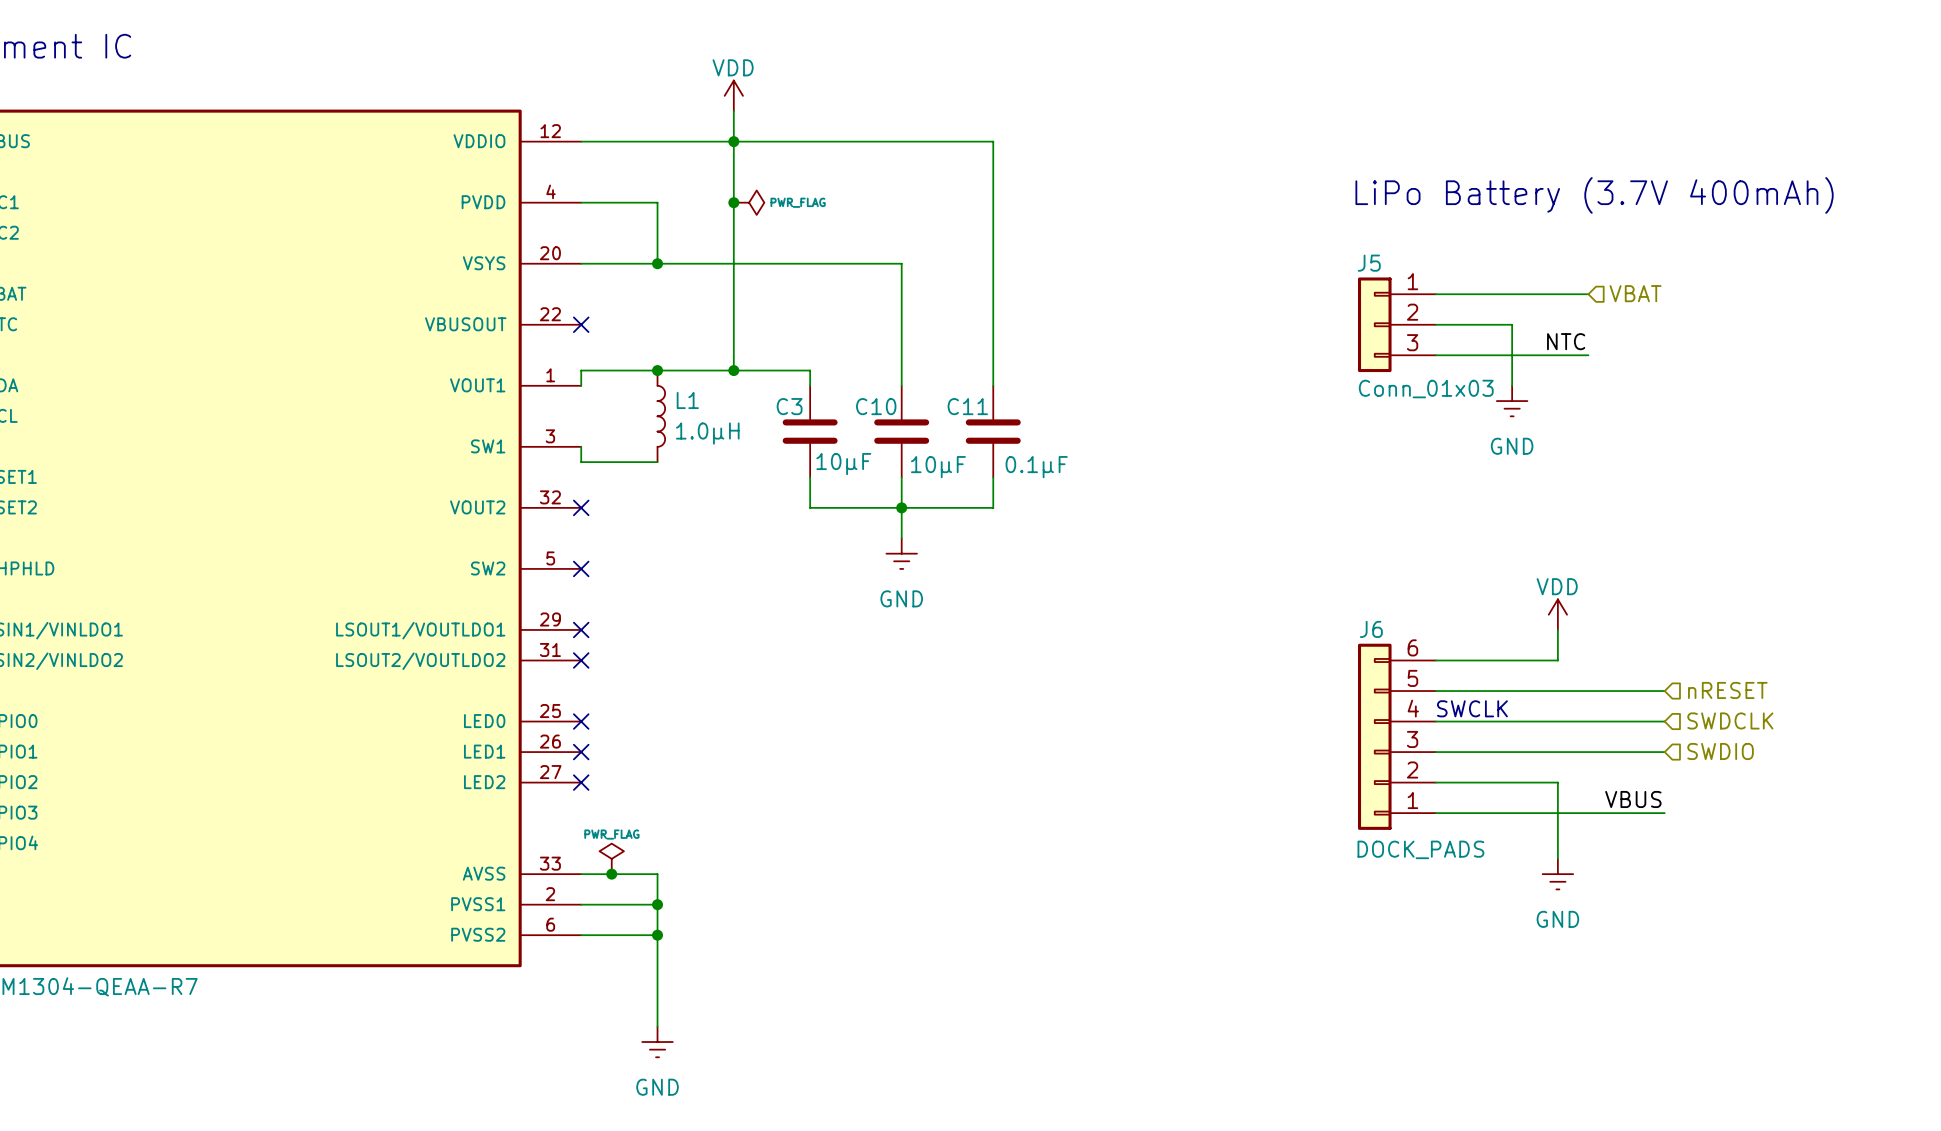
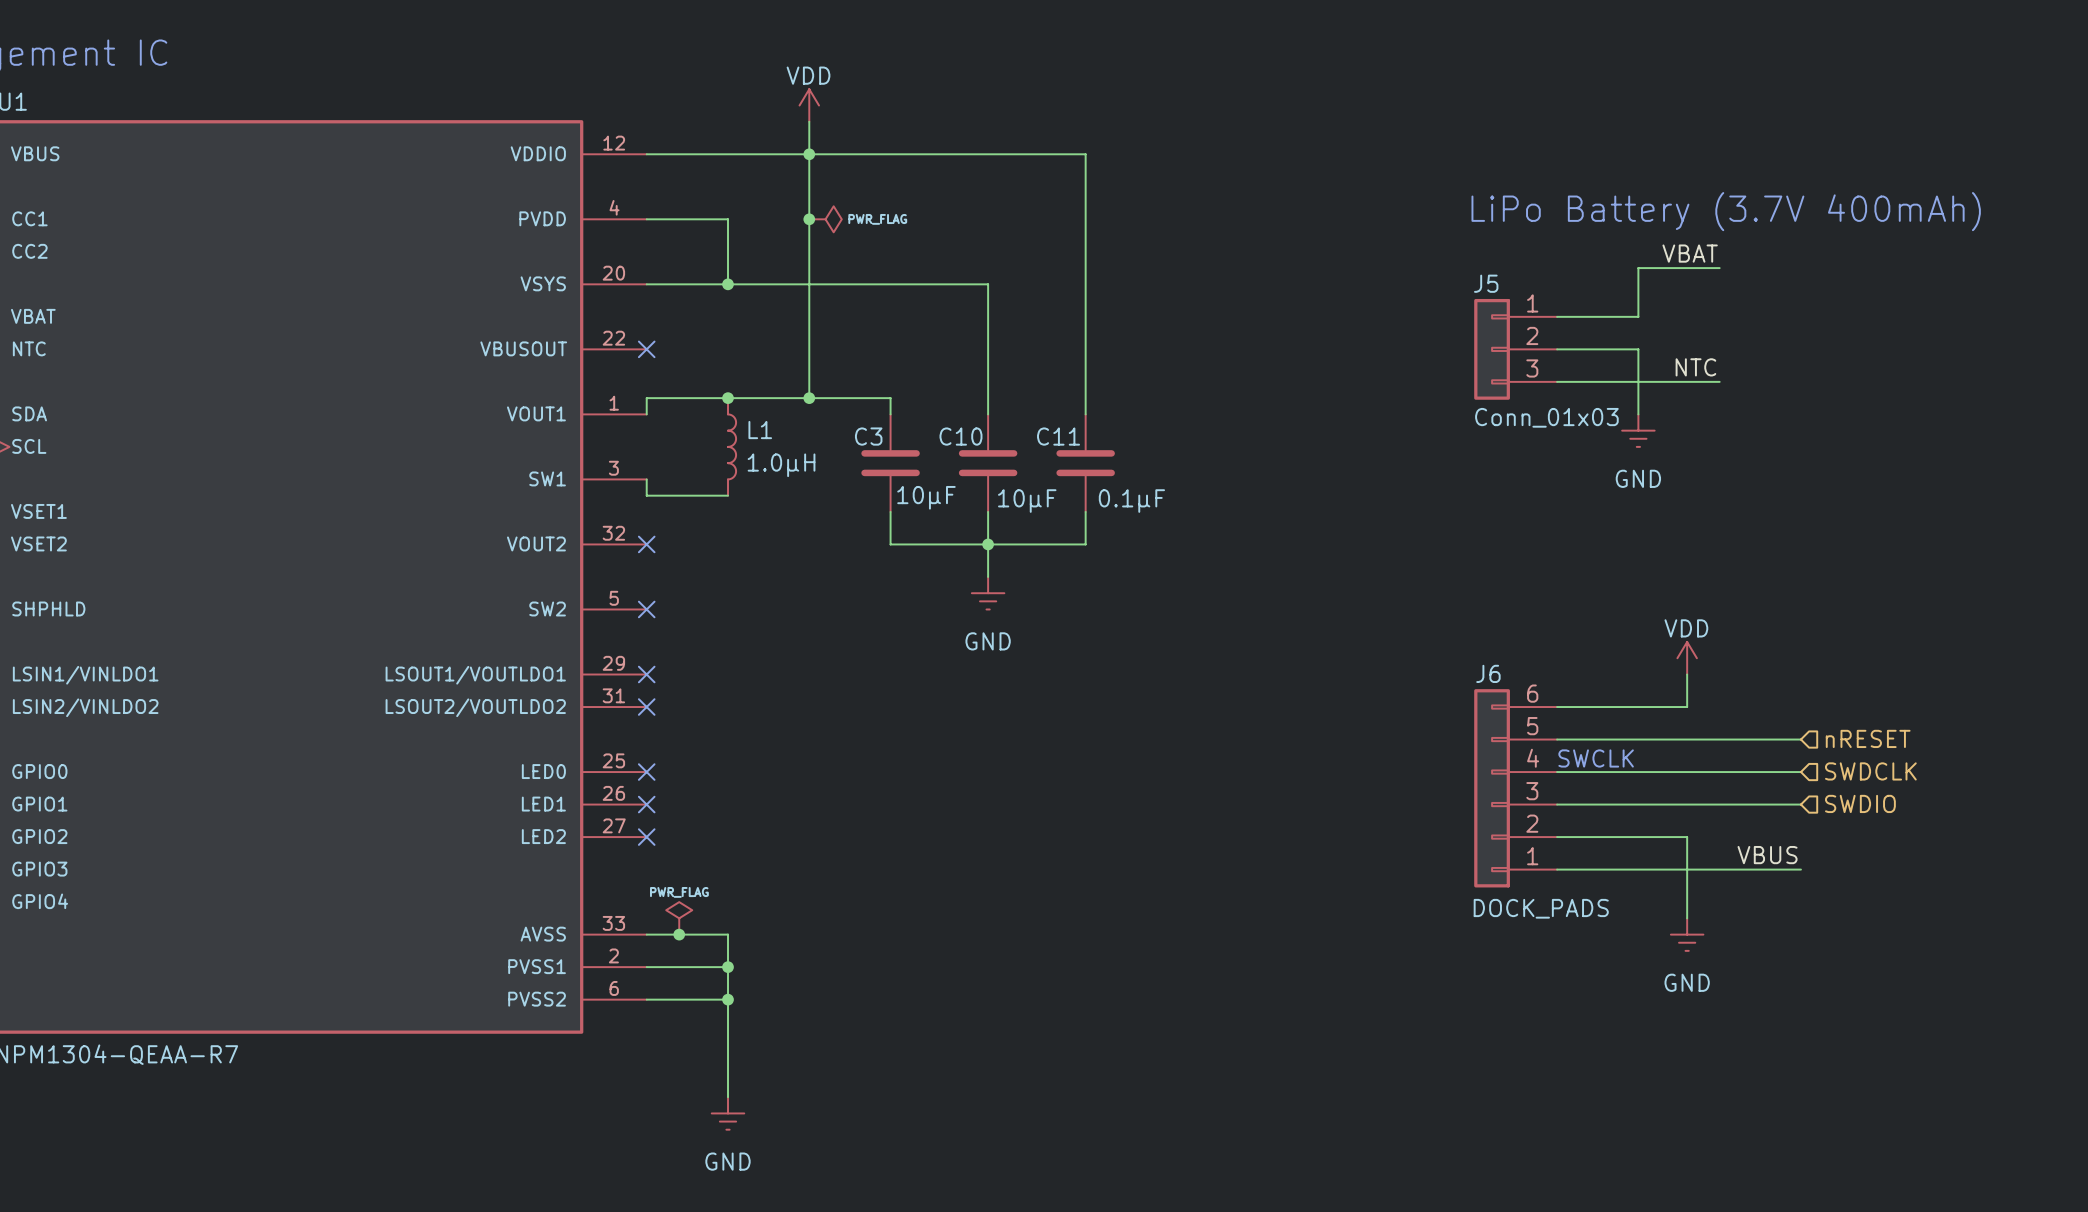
label: none -> VBAT (1690, 253)
hierarchical label: VBAT (1635, 293) -> none
wire: (1512, 294) (1588, 294) -> (1638, 316) (1638, 268) (1719, 268)

